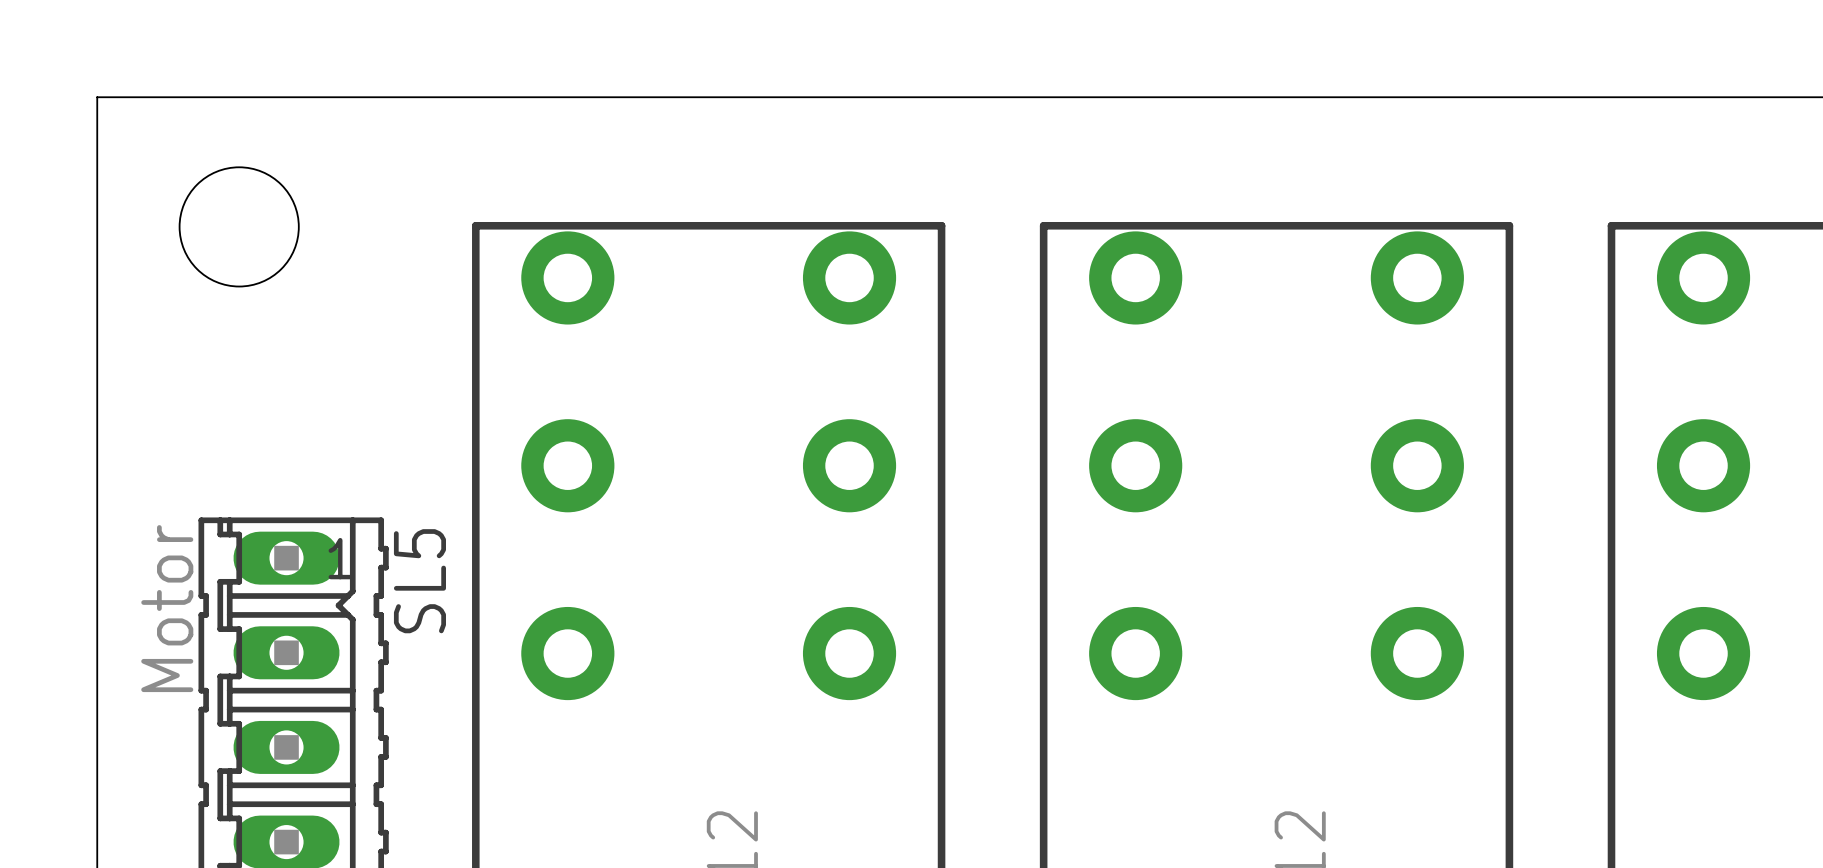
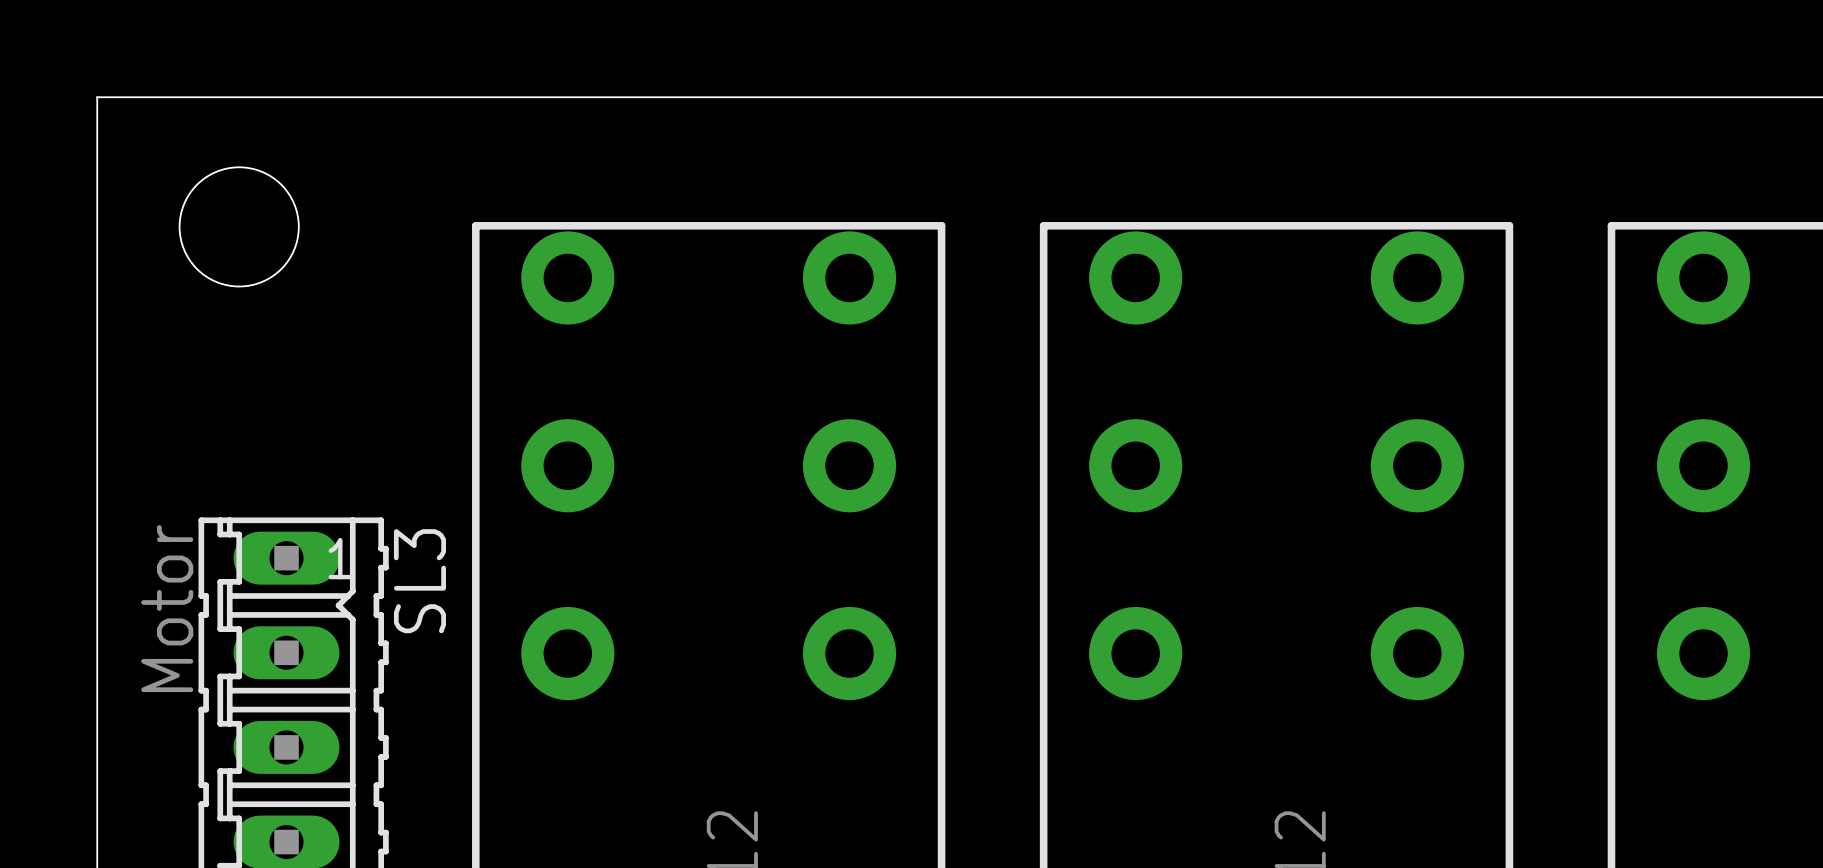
SL5 name: SL5 (419, 581) -> SL3 (419, 581)

